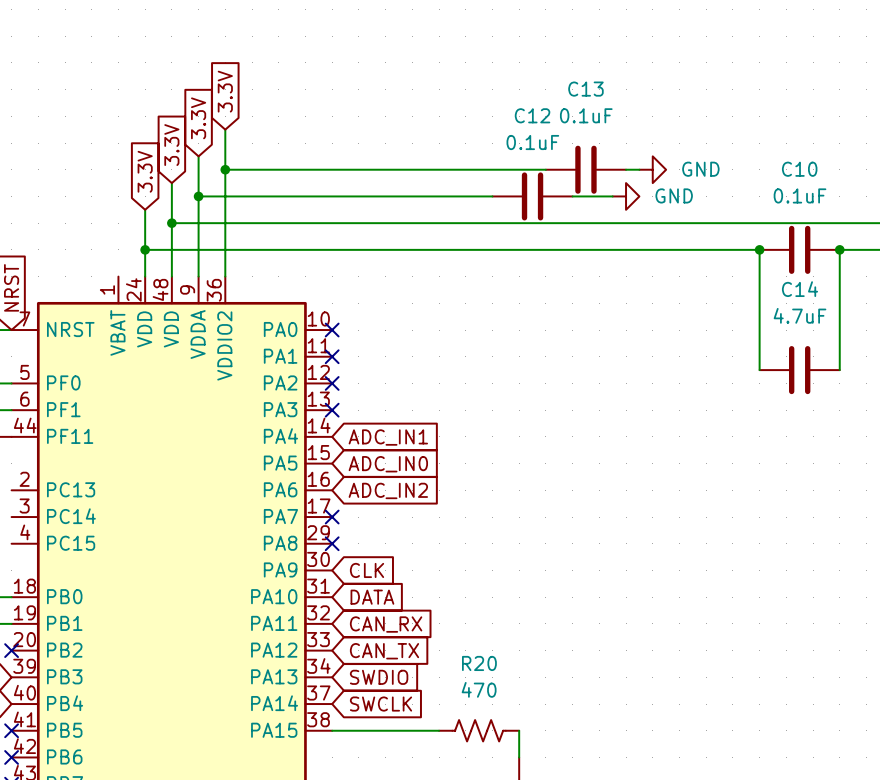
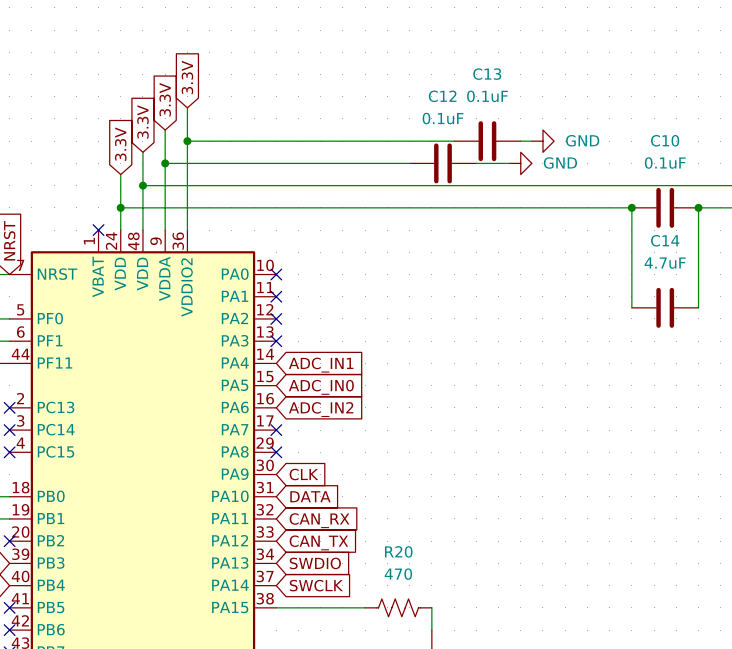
no-connect mark: none -> (98, 230)
no-connect mark: none -> (9, 407)
no-connect mark: none -> (9, 430)
no-connect mark: none -> (9, 452)

